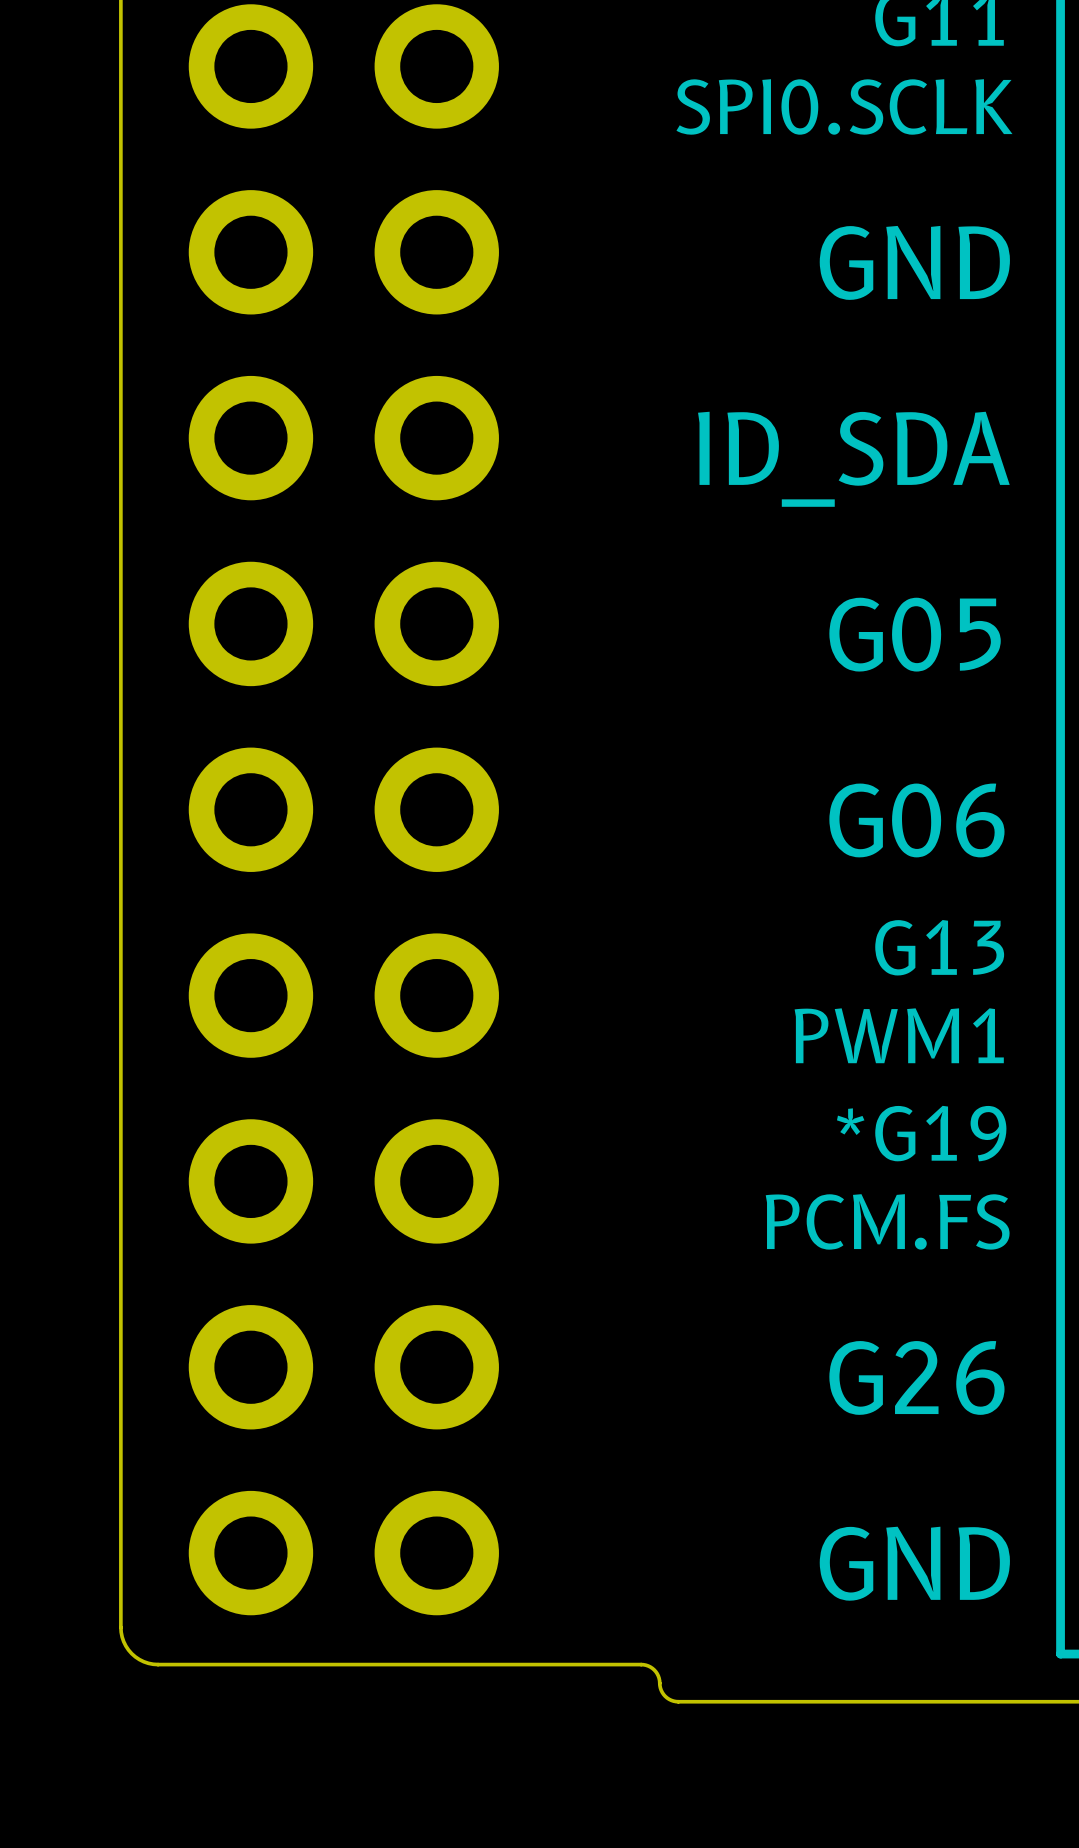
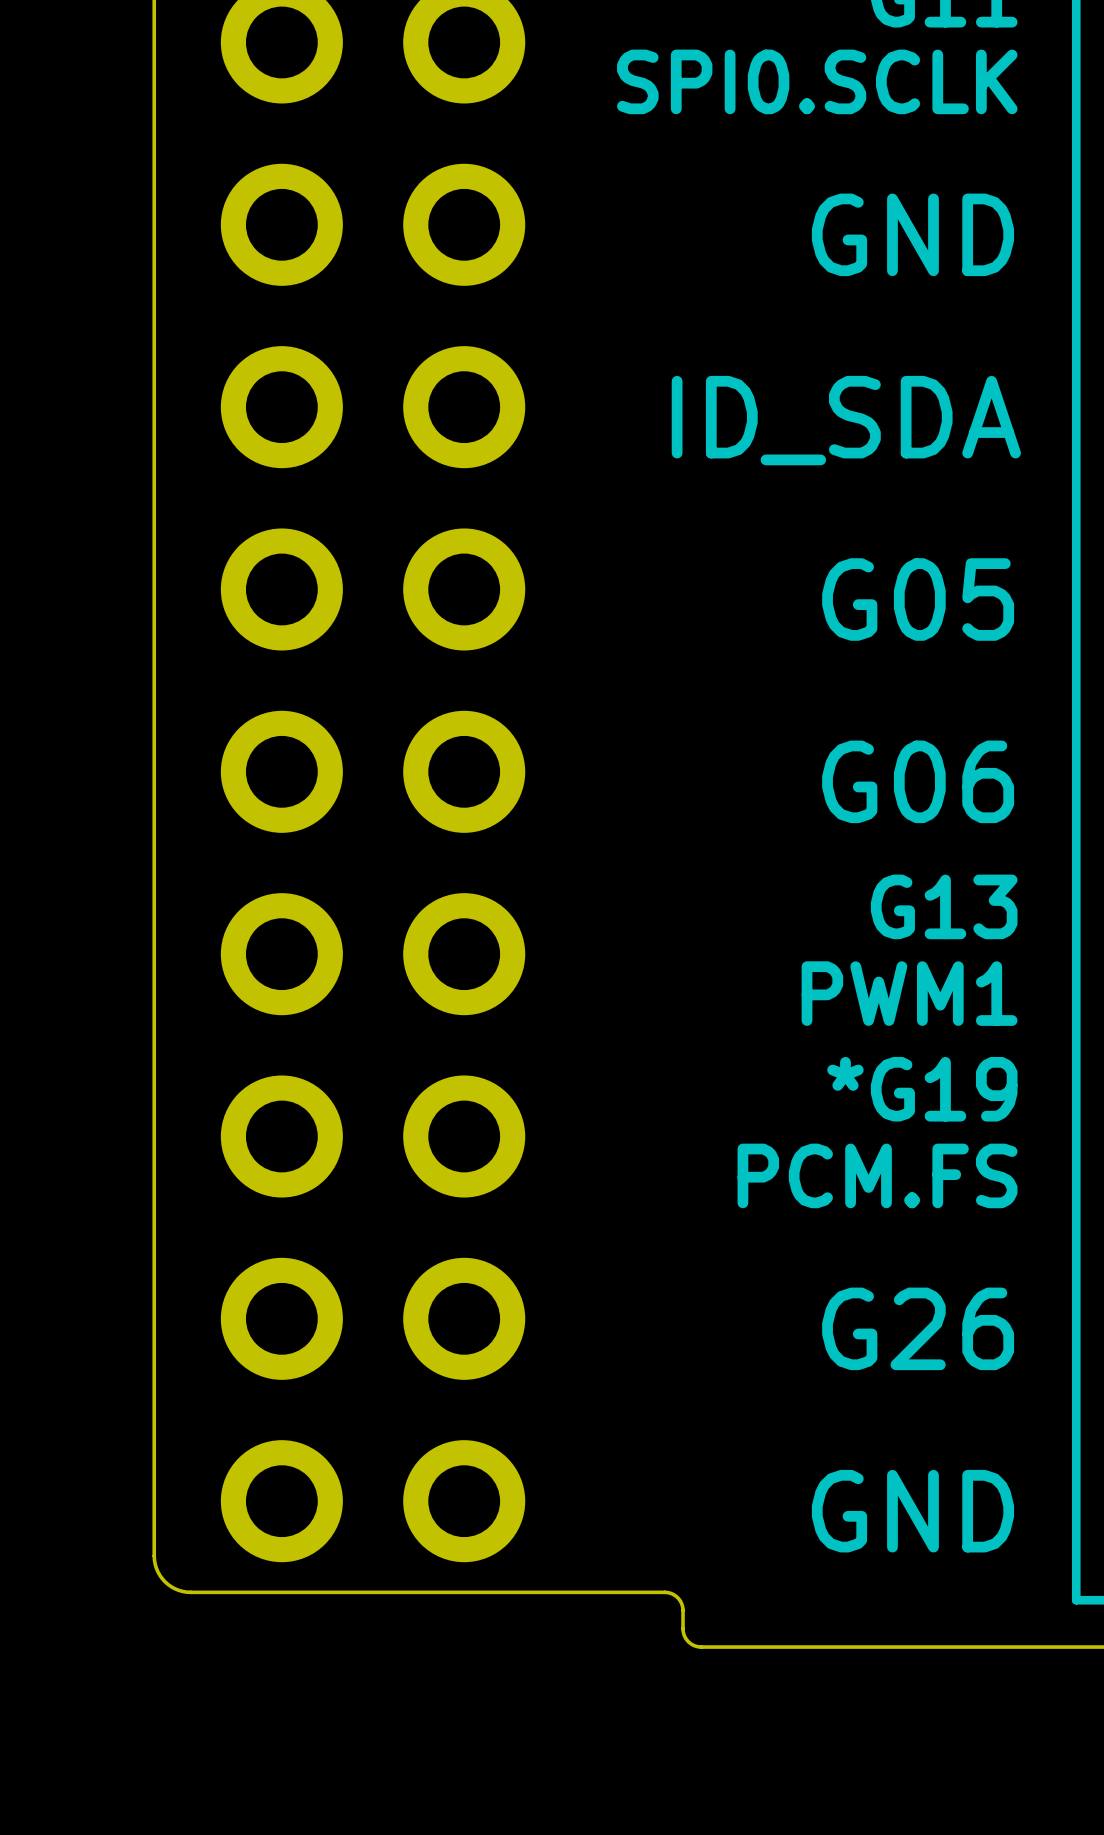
board edge: (120, 1608) (121, 1632) (125, 1645) (135, 1656) (153, 1664) (641, 1664) (654, 1670) (659, 1683) -> (154, 1555) (157, 1571) (164, 1581) (174, 1588) (186, 1592) (667, 1592) (675, 1596) (681, 1603) (683, 1628)

